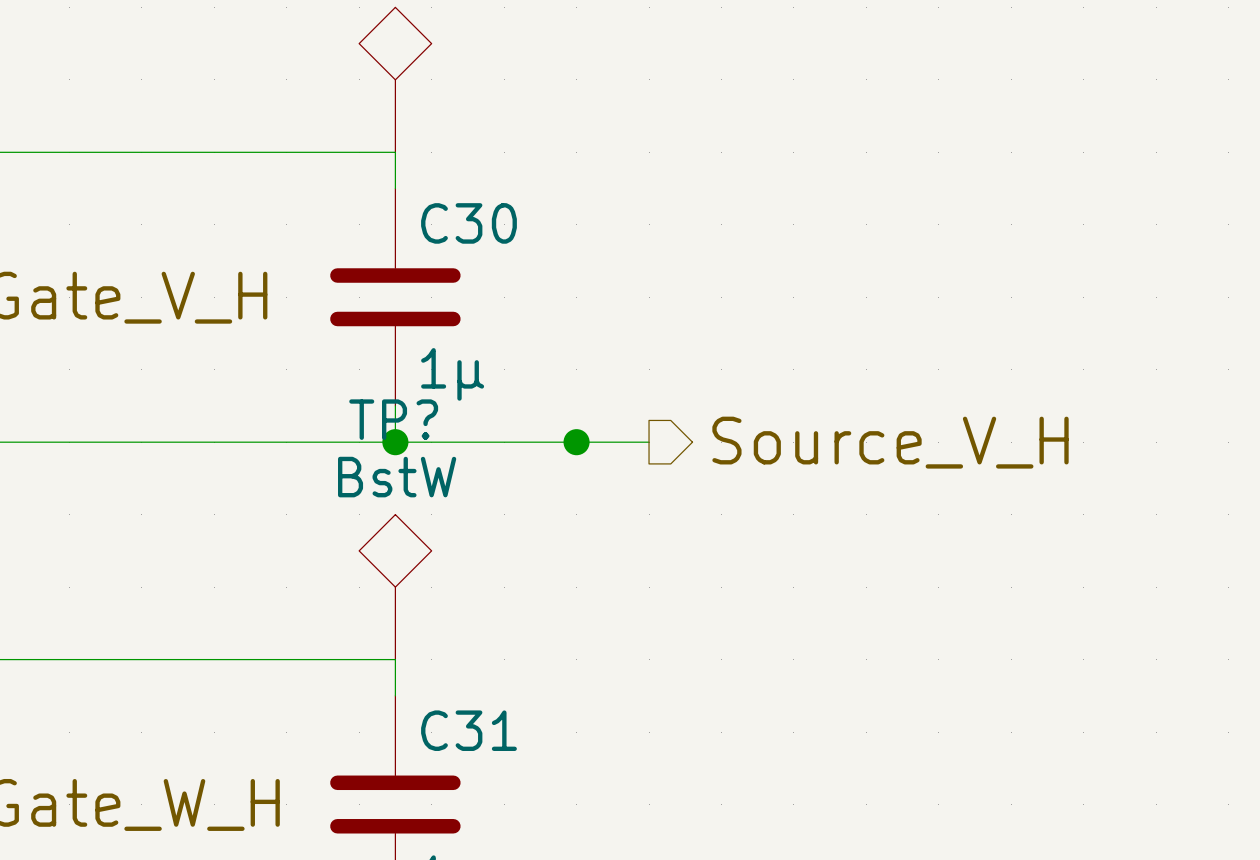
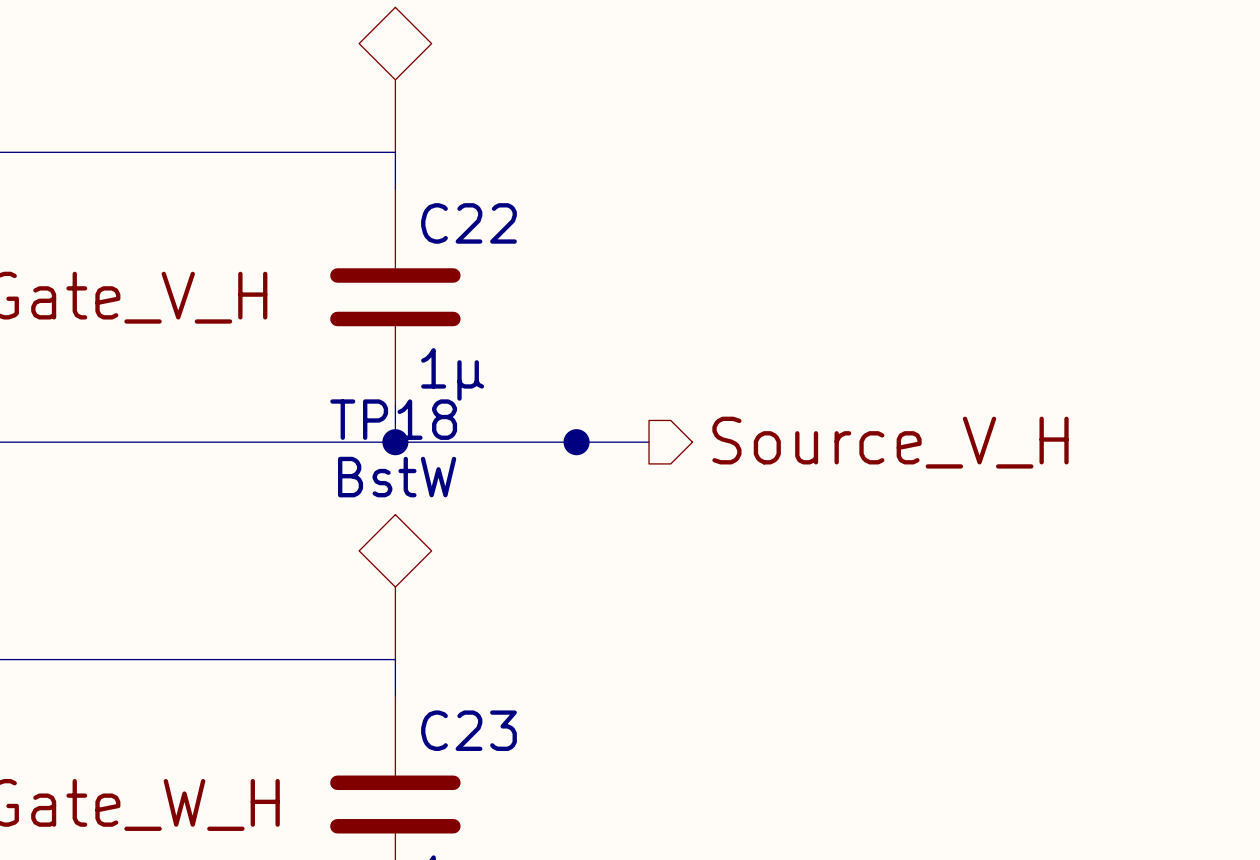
C30 name: C30 (468, 223) -> C22 (468, 223)
TP? name: TP? (393, 419) -> TP18 (393, 419)
C31 name: C31 (468, 730) -> C23 (468, 730)

